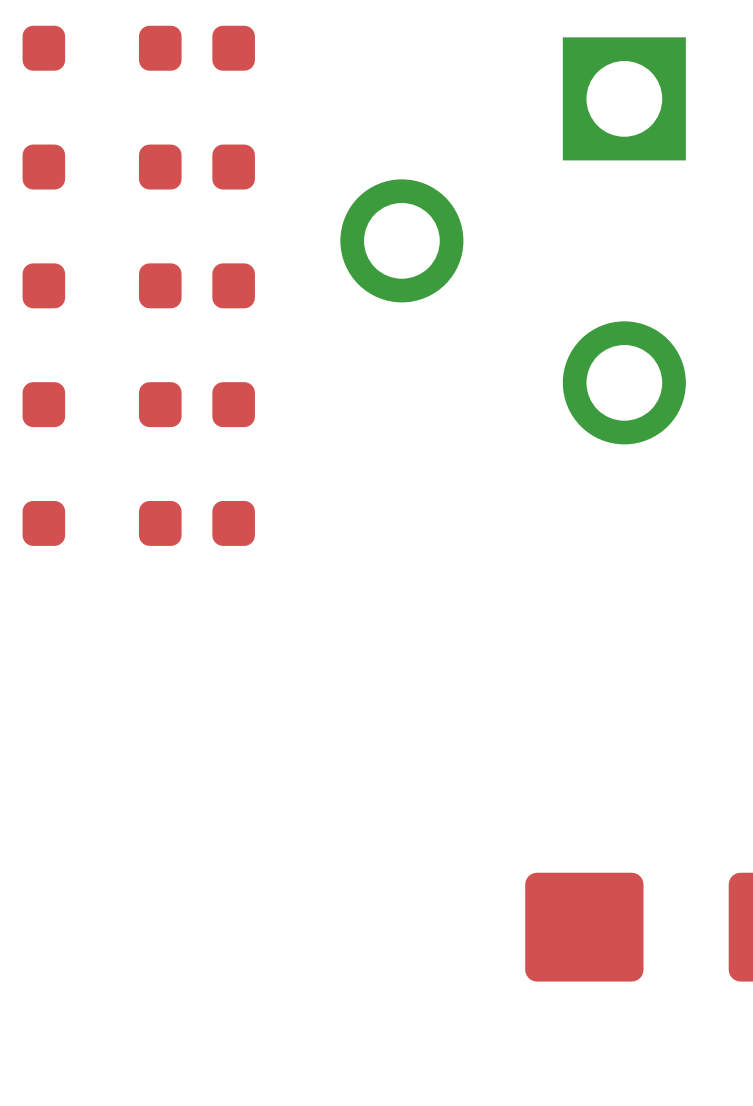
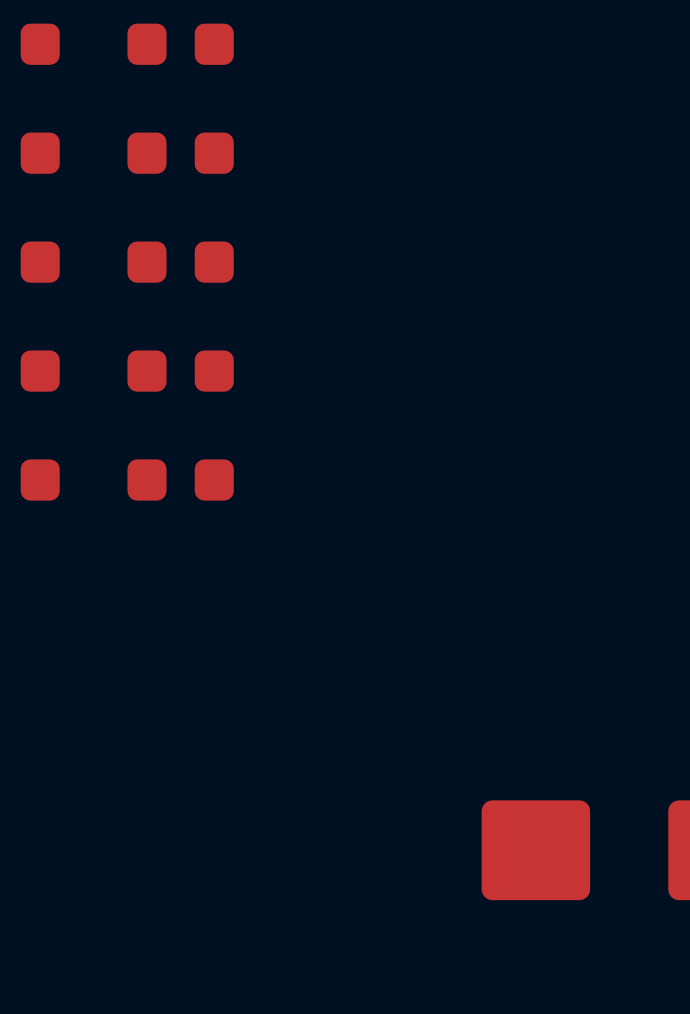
part: (513, 240) -> none

